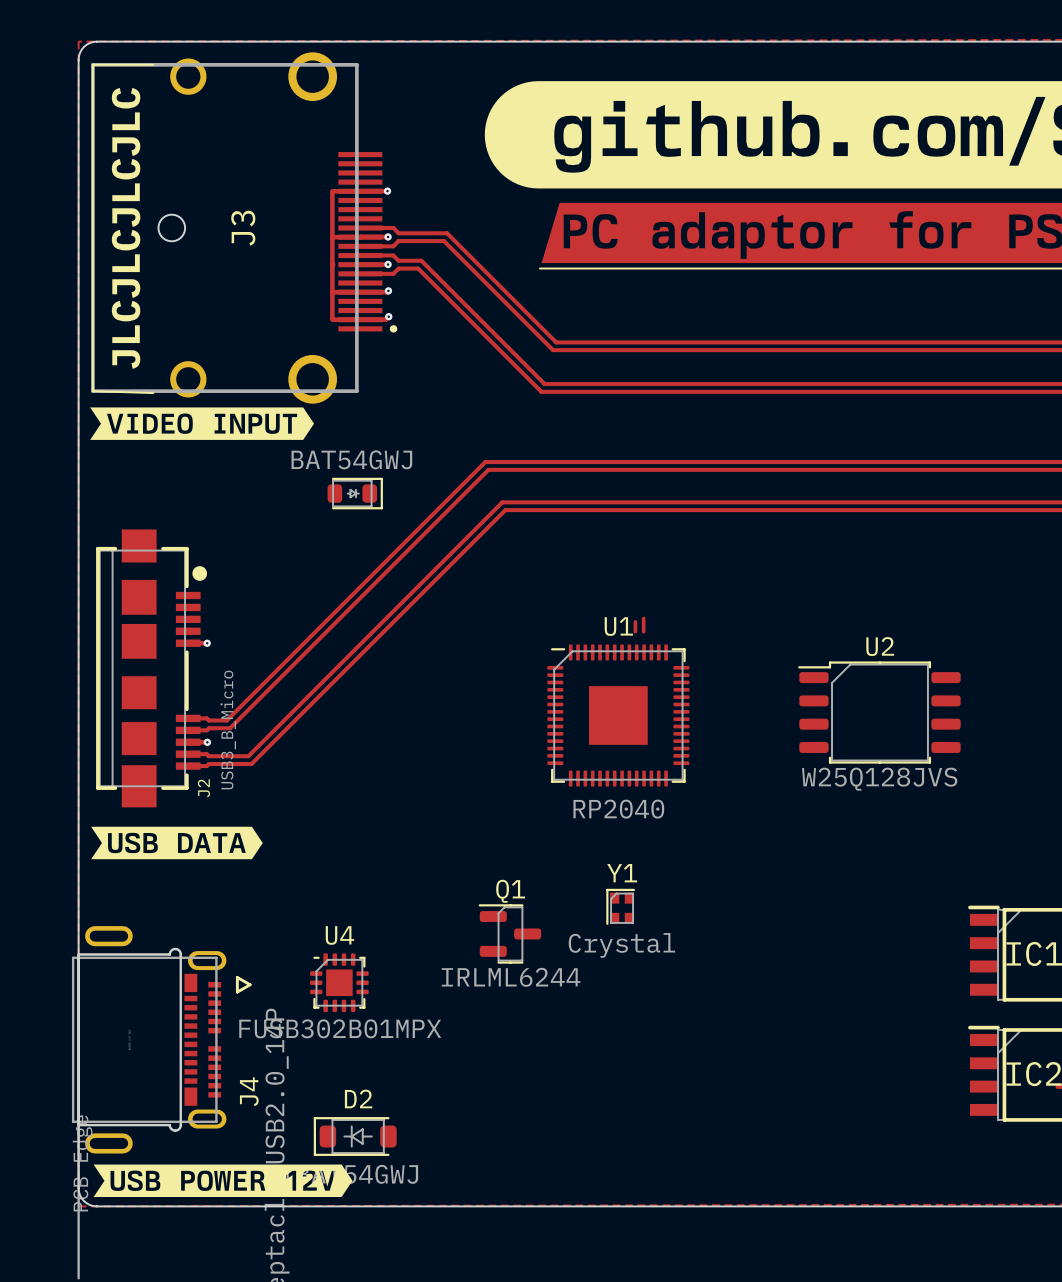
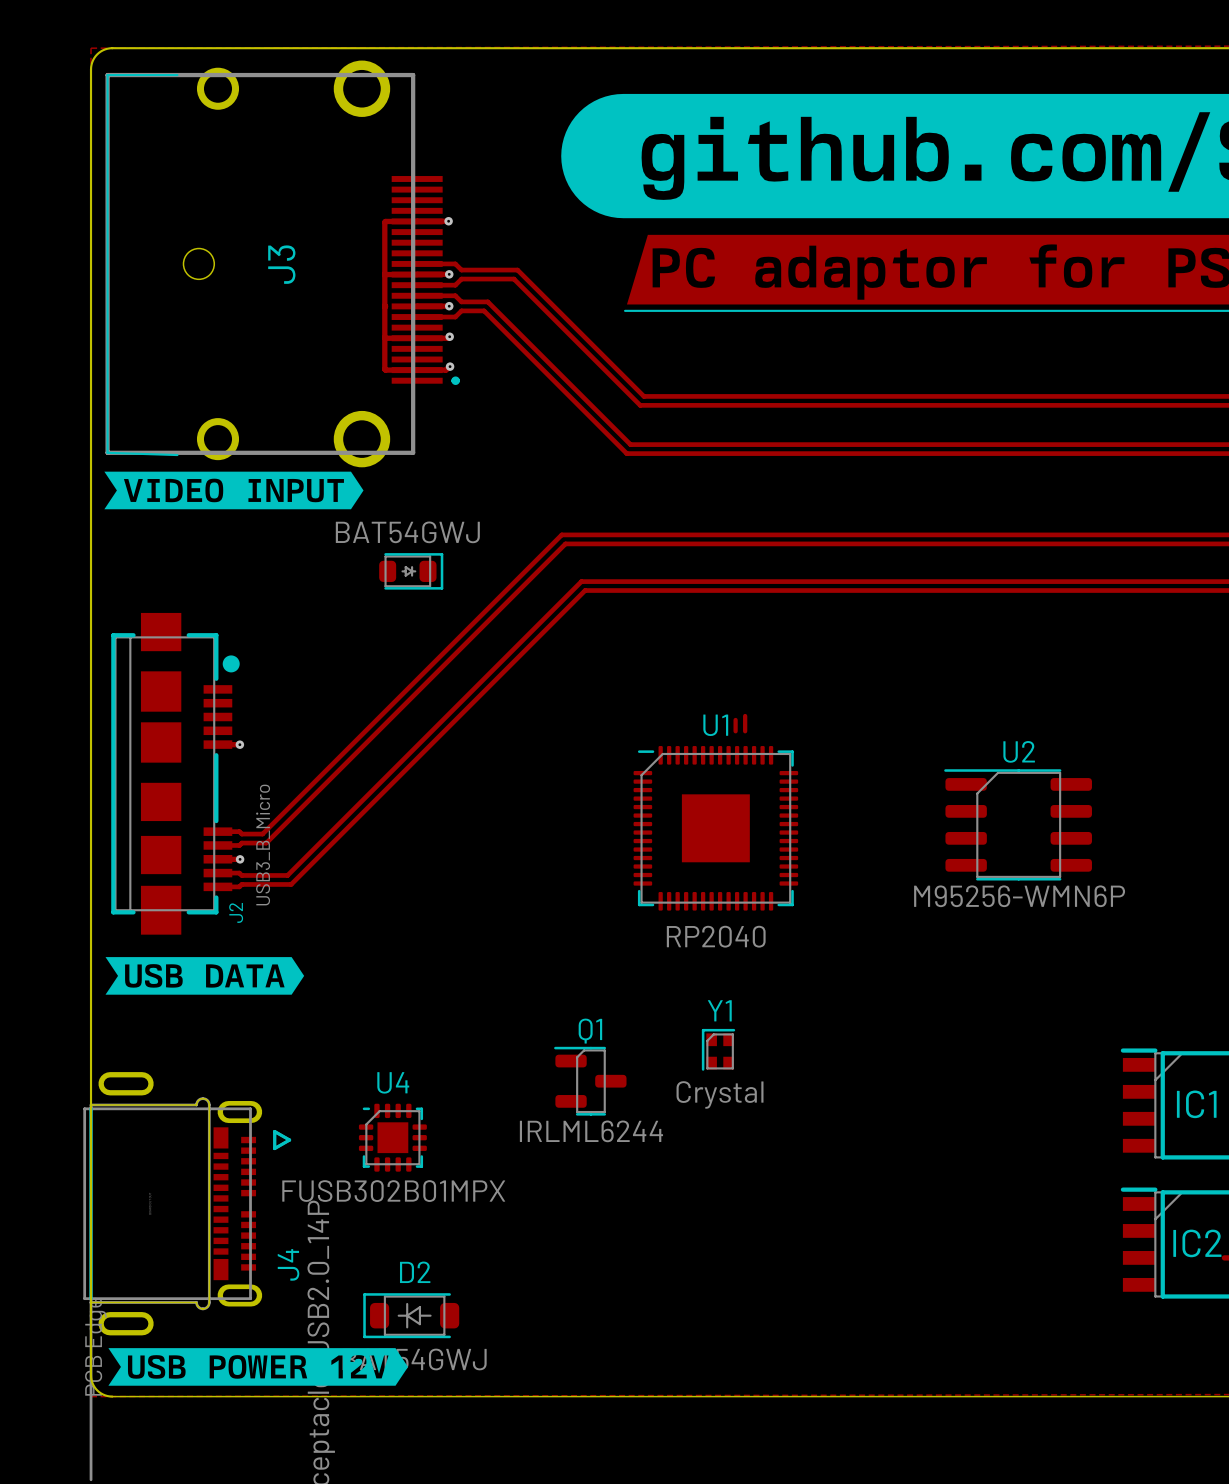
text: JLCJLCJLCJLC (126, 228) -> none
U2 footprint: [798, 661, 961, 764] -> [944, 769, 1092, 881]
U2 value: W25Q128JVS (879, 779) -> M95256-WMN6P (1019, 896)

